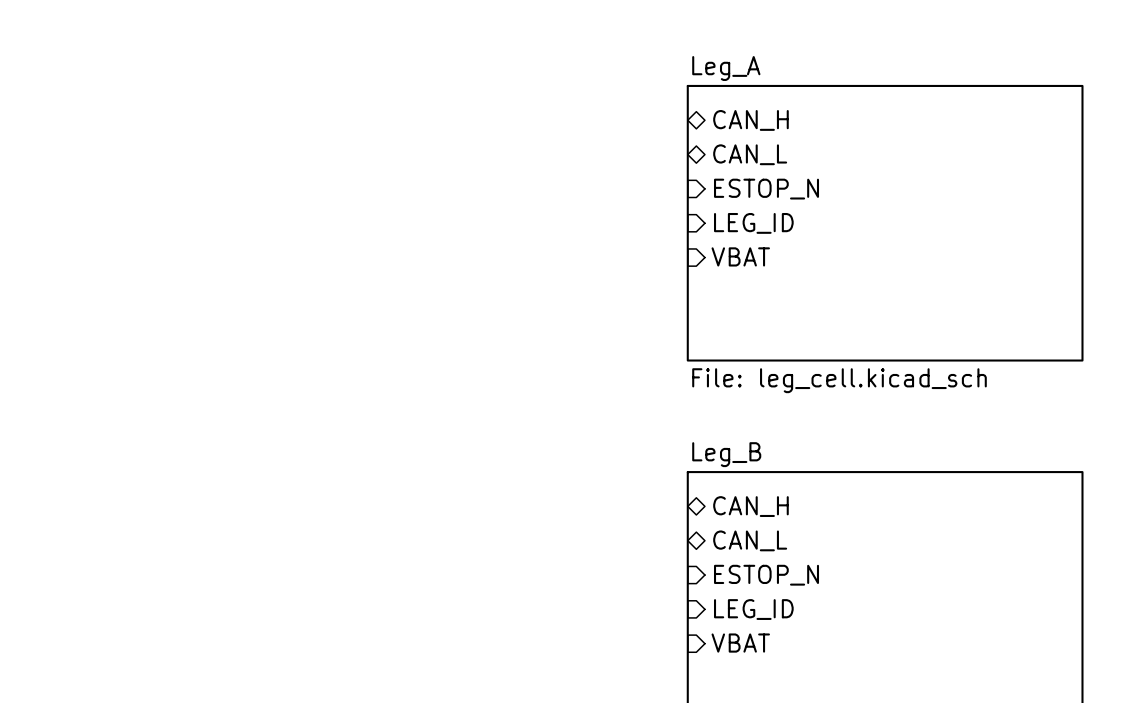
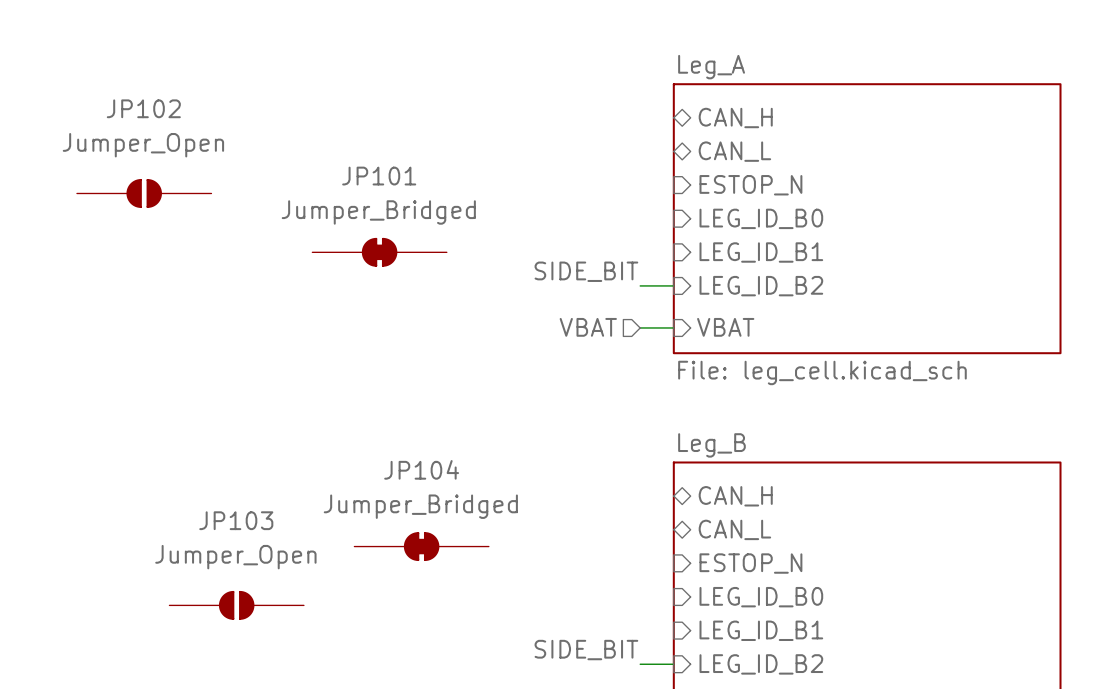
JP102: none -> Jumper_Open (144, 193)
sheet pin: LEG_ID (753, 223) -> LEG_ID_B0 (761, 218)
sheet pin: VBAT (740, 256) -> LEG_ID_B1 (761, 252)
JP101: none -> Jumper_Bridged (379, 252)
label: none -> SIDE_BIT (586, 271)
wire: none -> (640, 285) (673, 285)
sheet pin: none -> LEG_ID_B2 (761, 286)
hierarchical label: none -> VBAT (588, 327)
wire: none -> (640, 327) (673, 327)
sheet pin: none -> VBAT (725, 327)
JP104: none -> Jumper_Bridged (421, 546)
sheet pin: LEG_ID (753, 609) -> LEG_ID_B0 (761, 597)
JP103: none -> Jumper_Open (236, 605)
sheet pin: VBAT (740, 643) -> LEG_ID_B1 (761, 630)
label: none -> SIDE_BIT (586, 650)
wire: none -> (640, 664) (673, 664)
sheet pin: none -> LEG_ID_B2 (761, 664)

